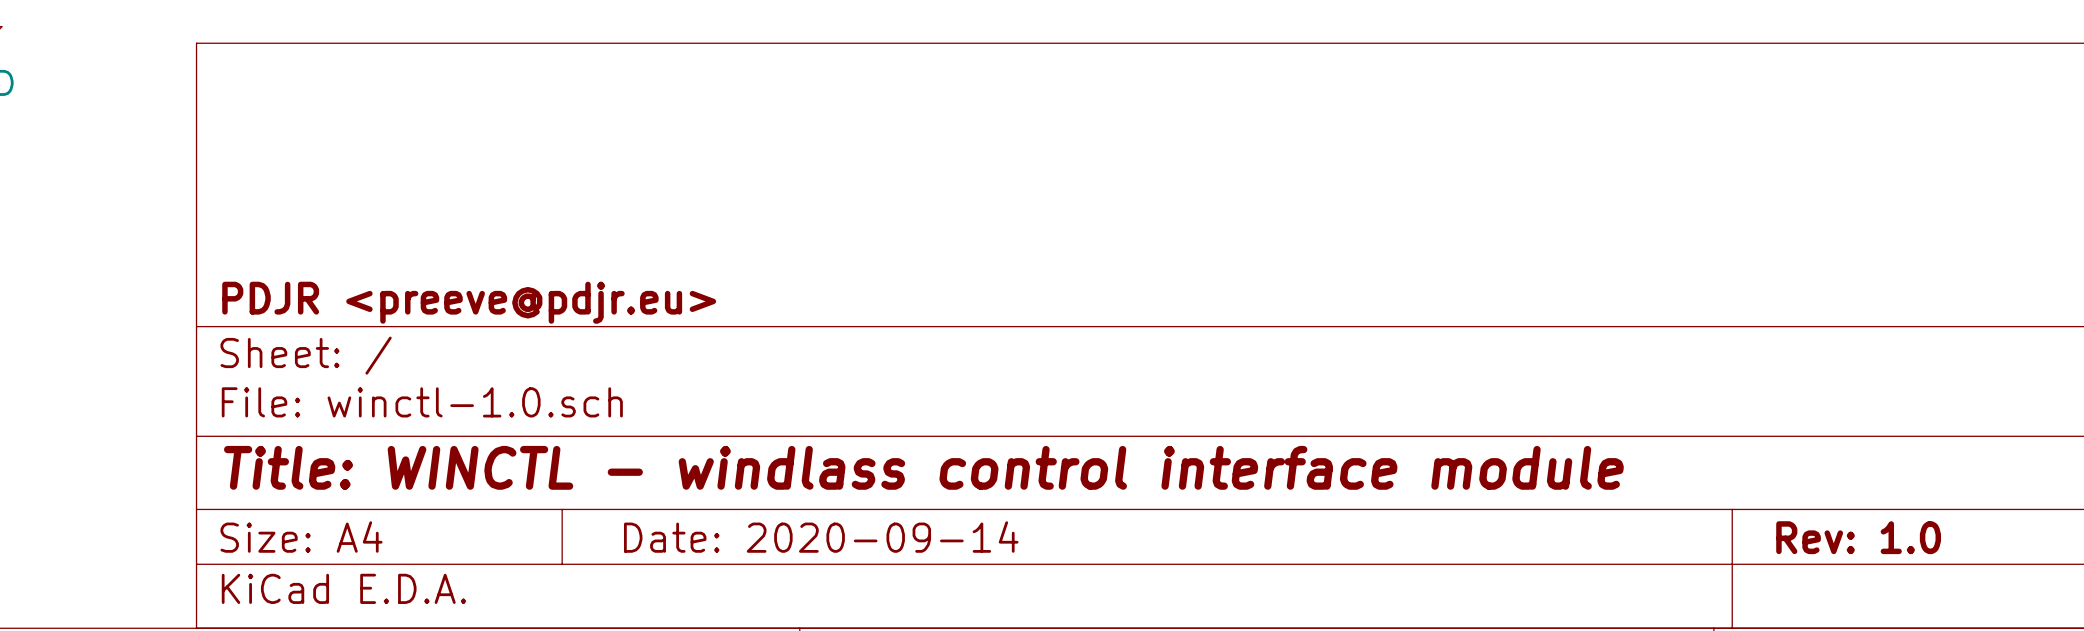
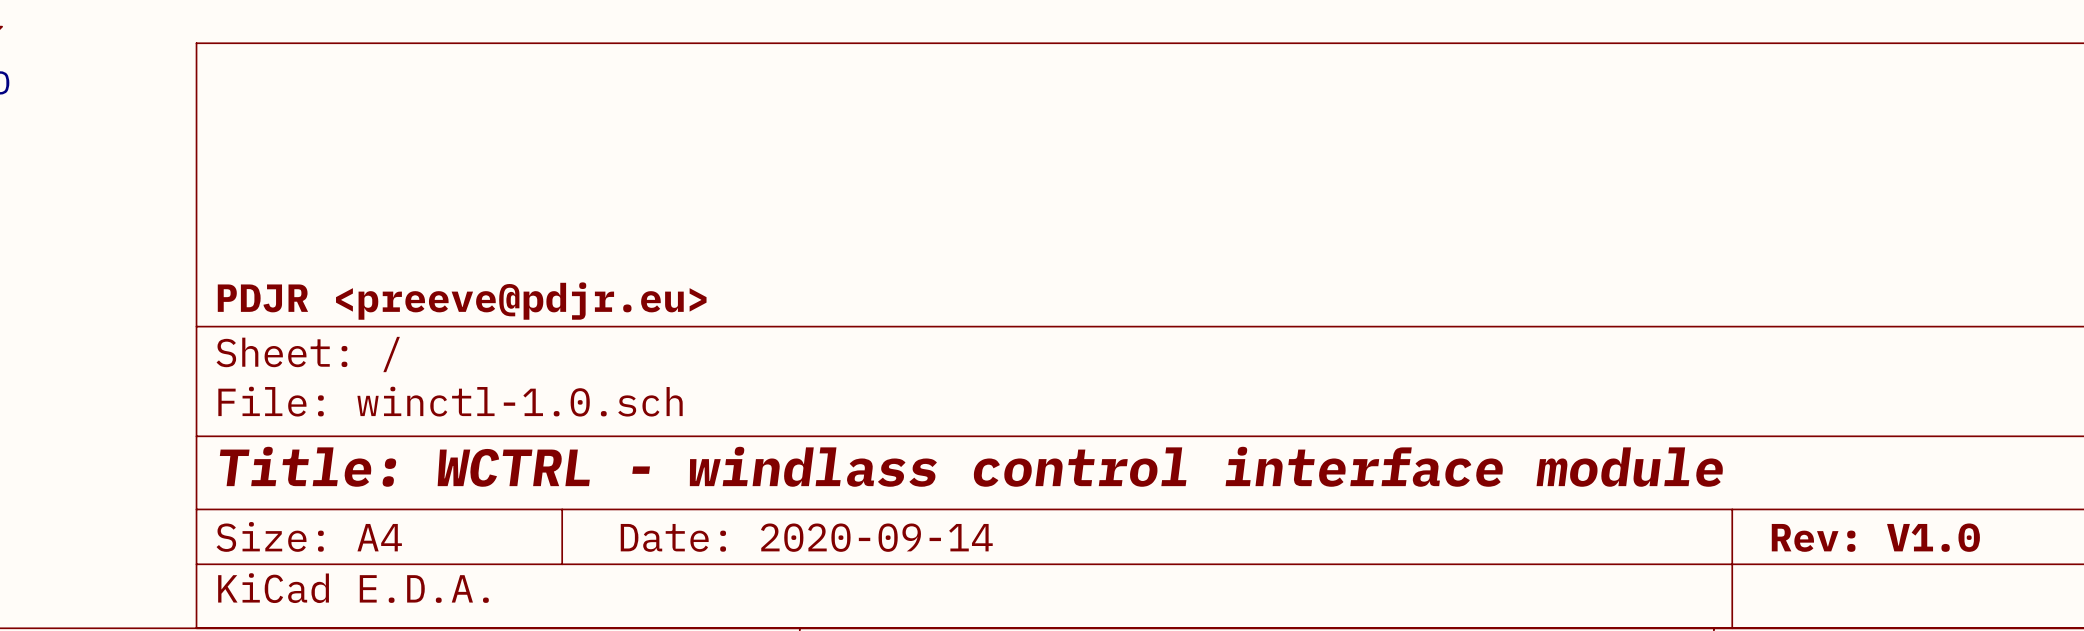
title block: Title: WINCTL - windlass control interface module (923, 467) -> Title: WCTRL - windlass control interface module (971, 466)
title block: Rev: 1.0 (1858, 537) -> Rev: V1.0 (1875, 537)

